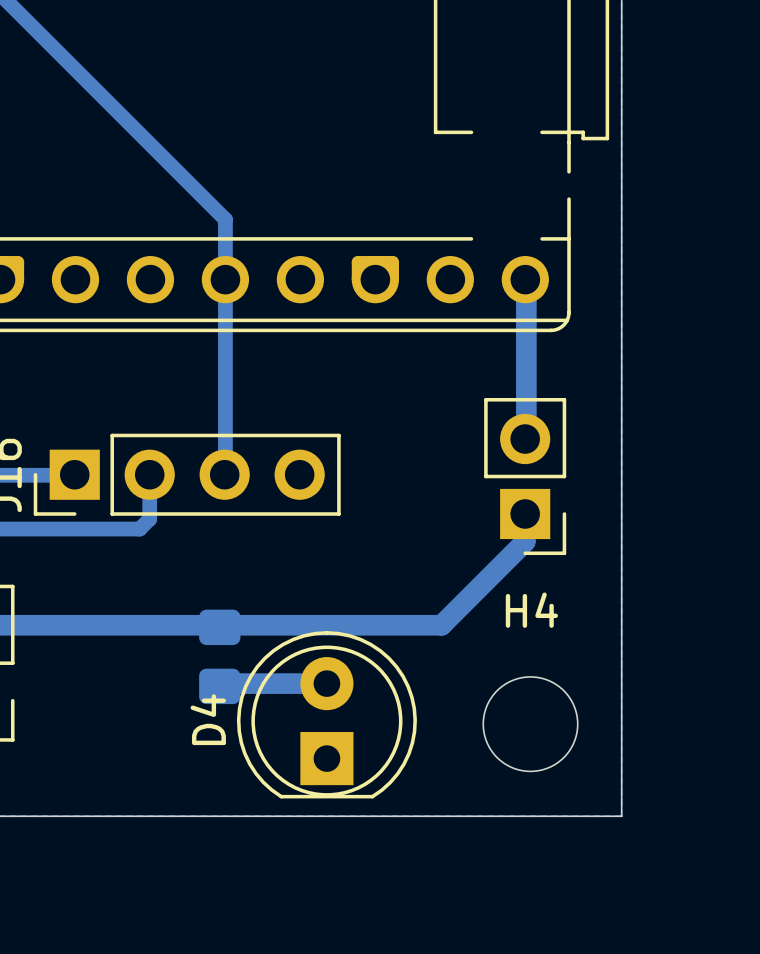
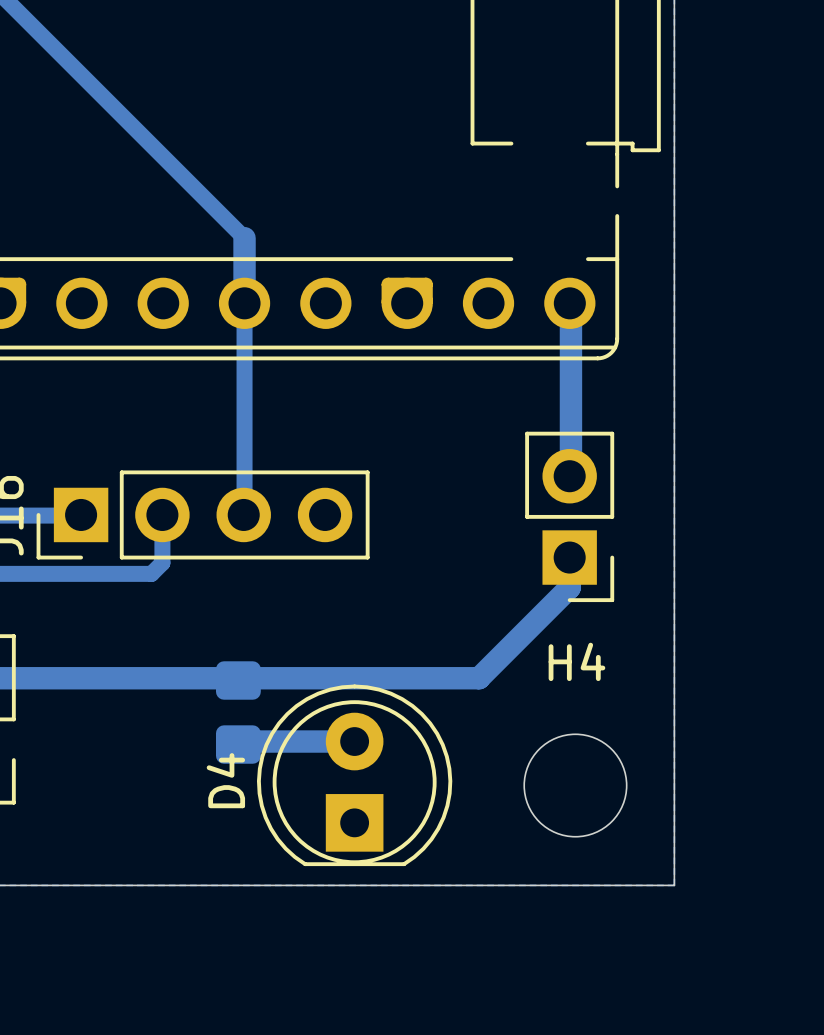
bottom track width: thin (225, 219) (225, 279) -> thick (244, 238) (244, 303)

